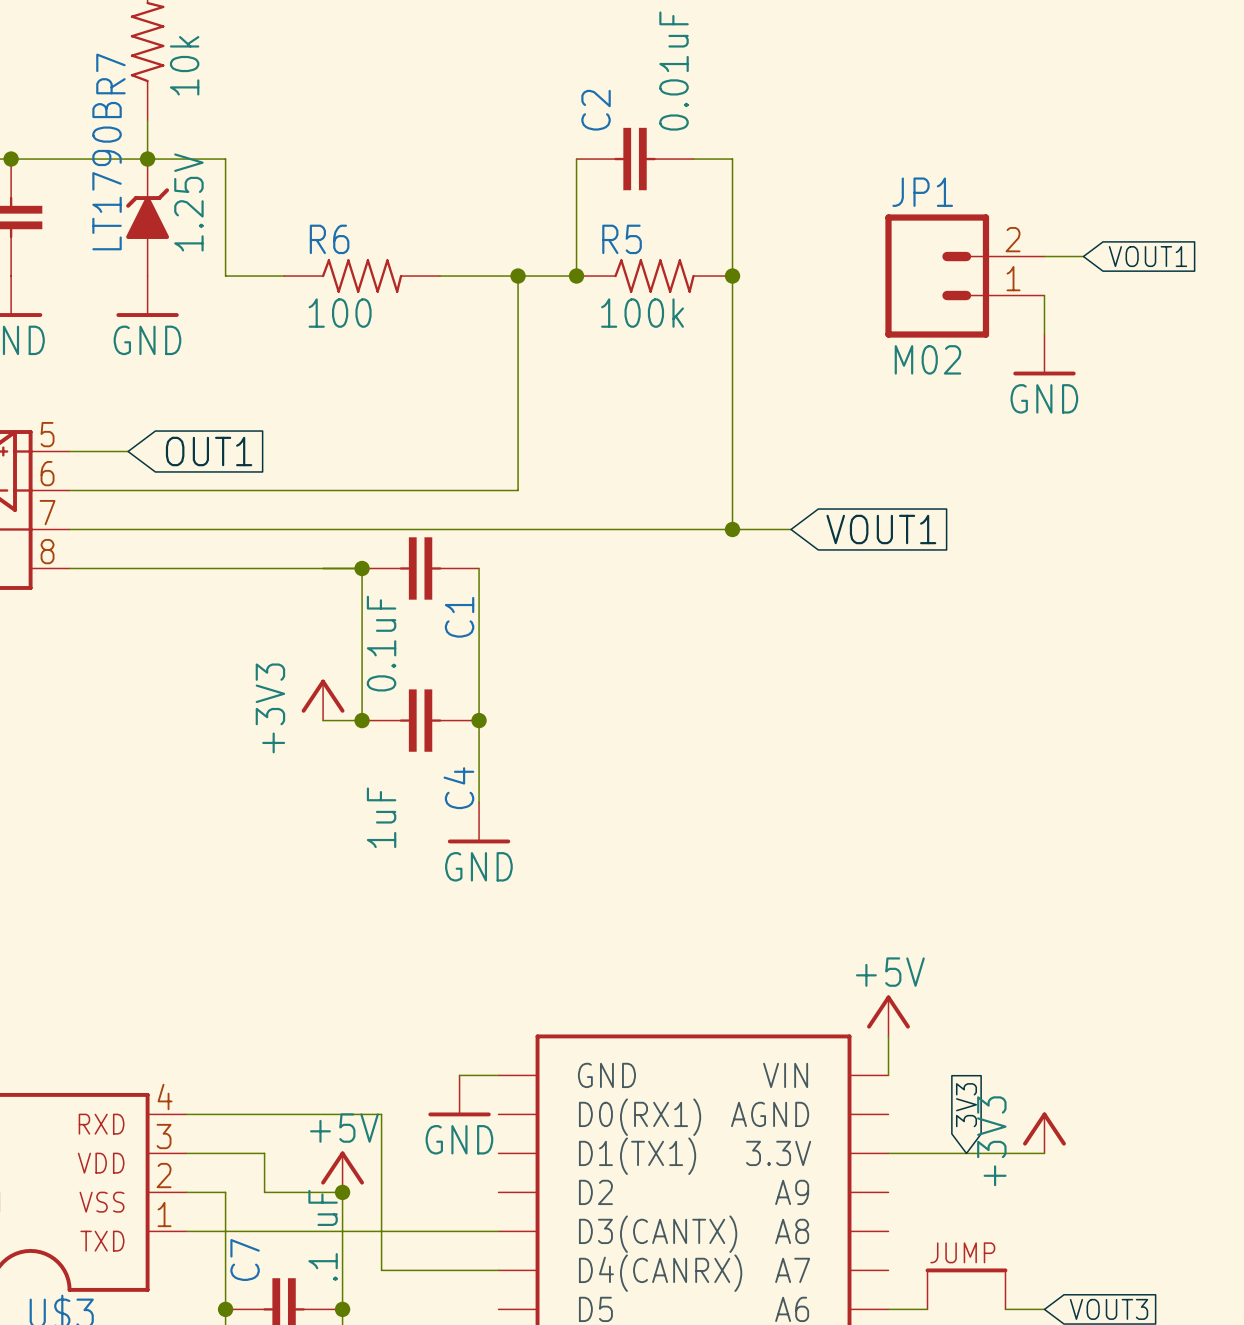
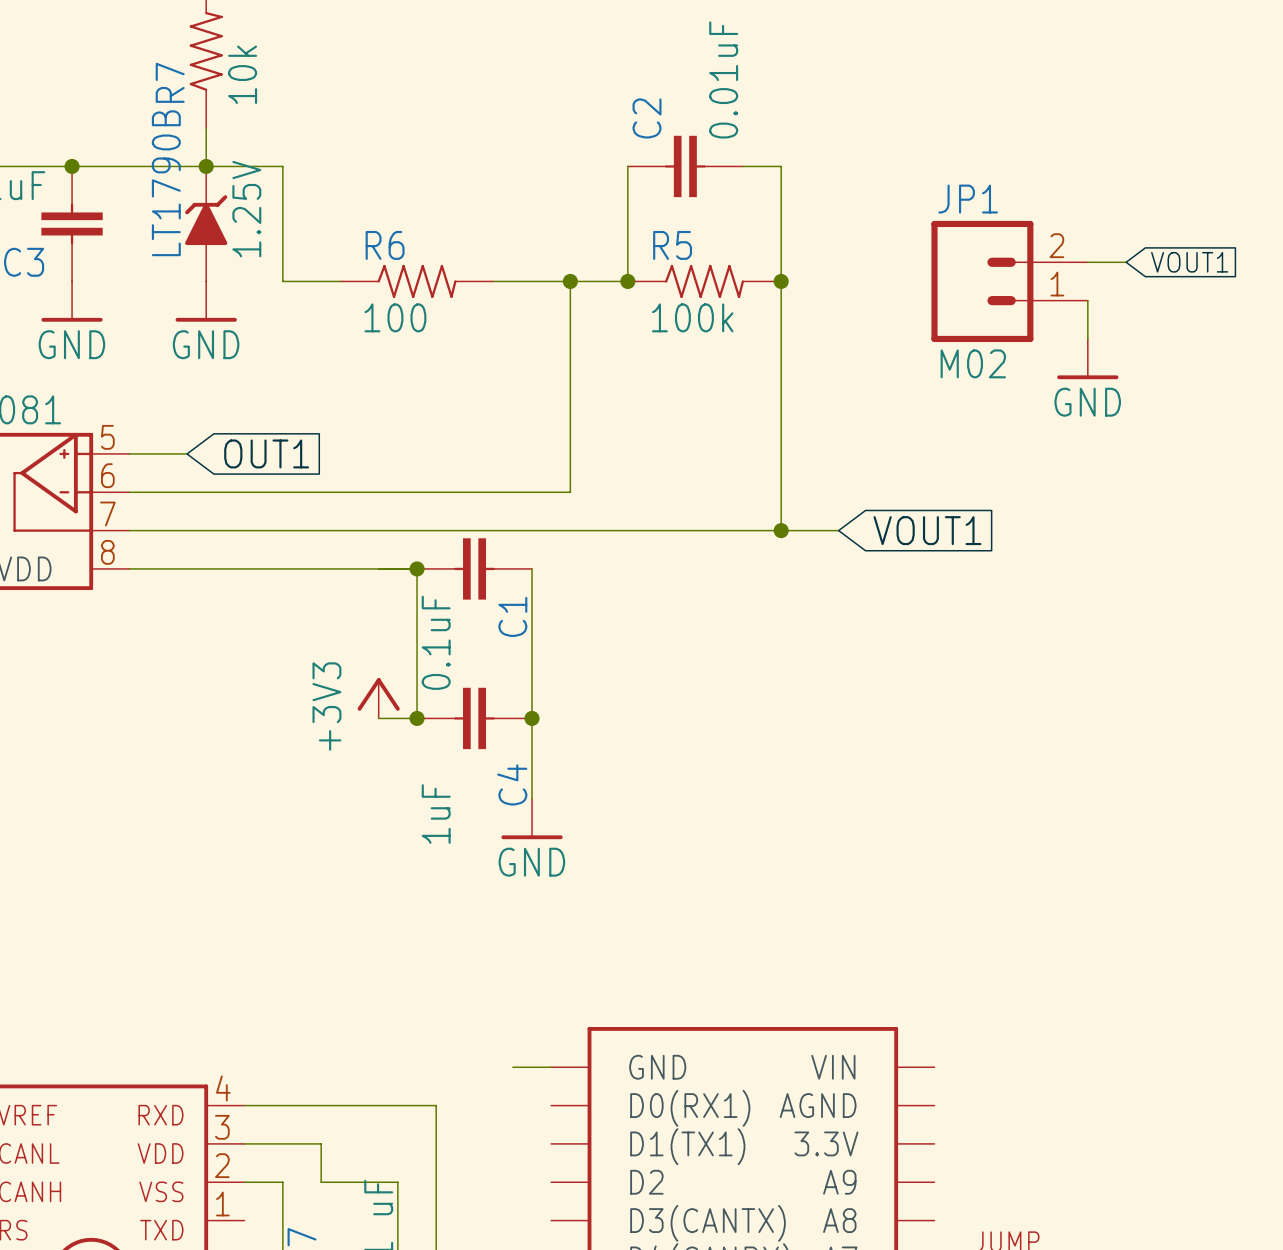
power symbol: +5V (888, 1015) -> none
wire: (888, 1036) (888, 1075) -> none
power symbol: GND (459, 1095) -> none
global label: 3V3 (966, 1105) -> none
power symbol: +3V3 (1044, 1132) -> none
wire: (888, 1153) (1044, 1153) -> none
power symbol: +5V (342, 1171) -> none
junction: (342, 1192) -> none
wire: (186, 1231) (498, 1231) -> none

